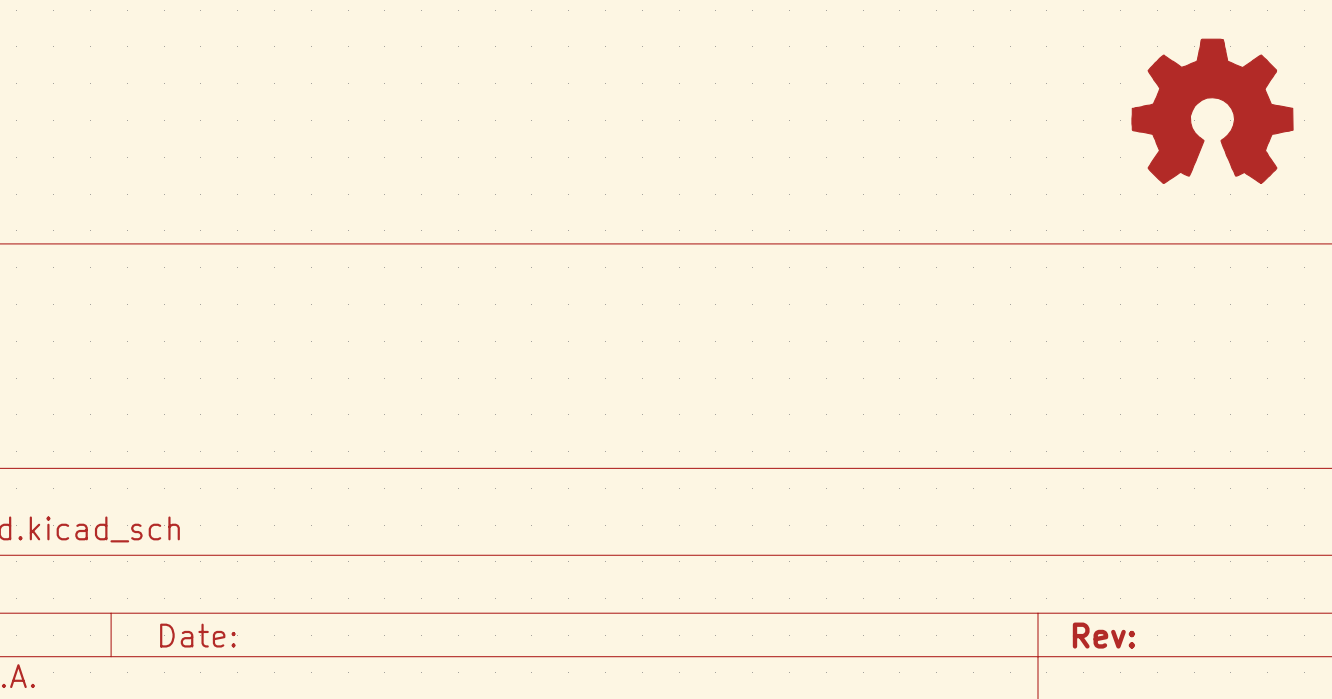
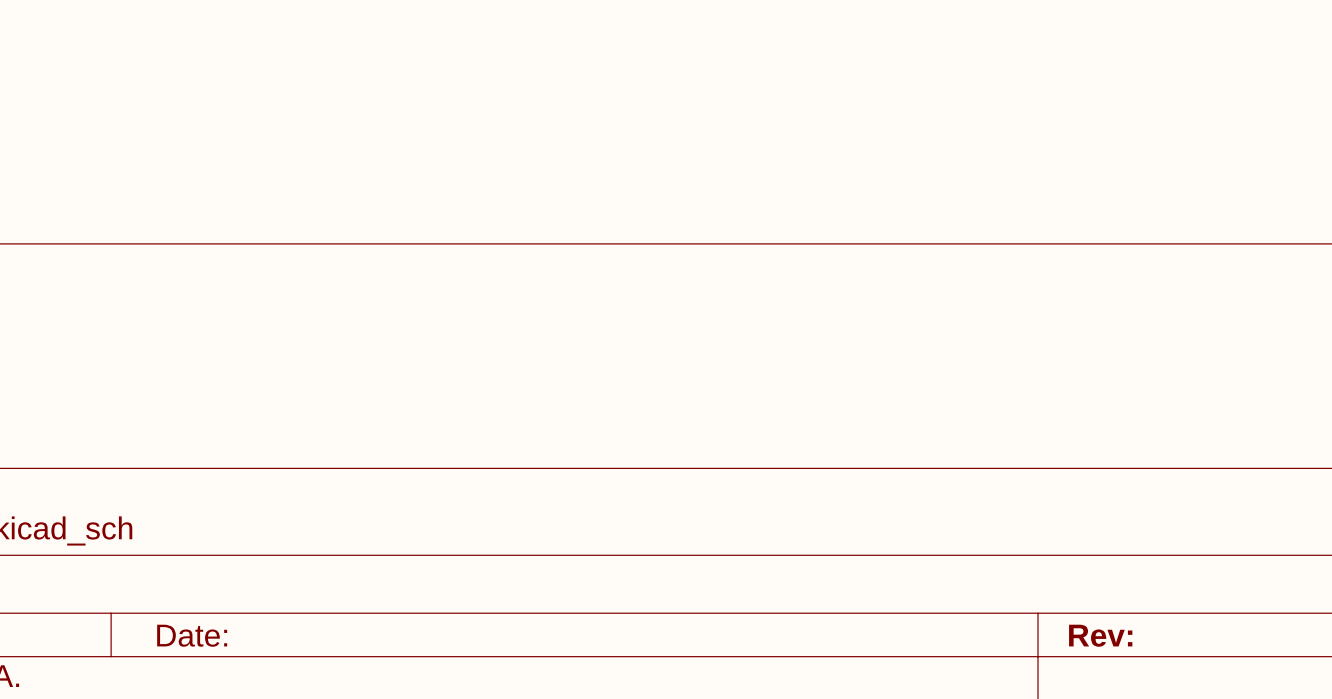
part: (1212, 111) -> none

